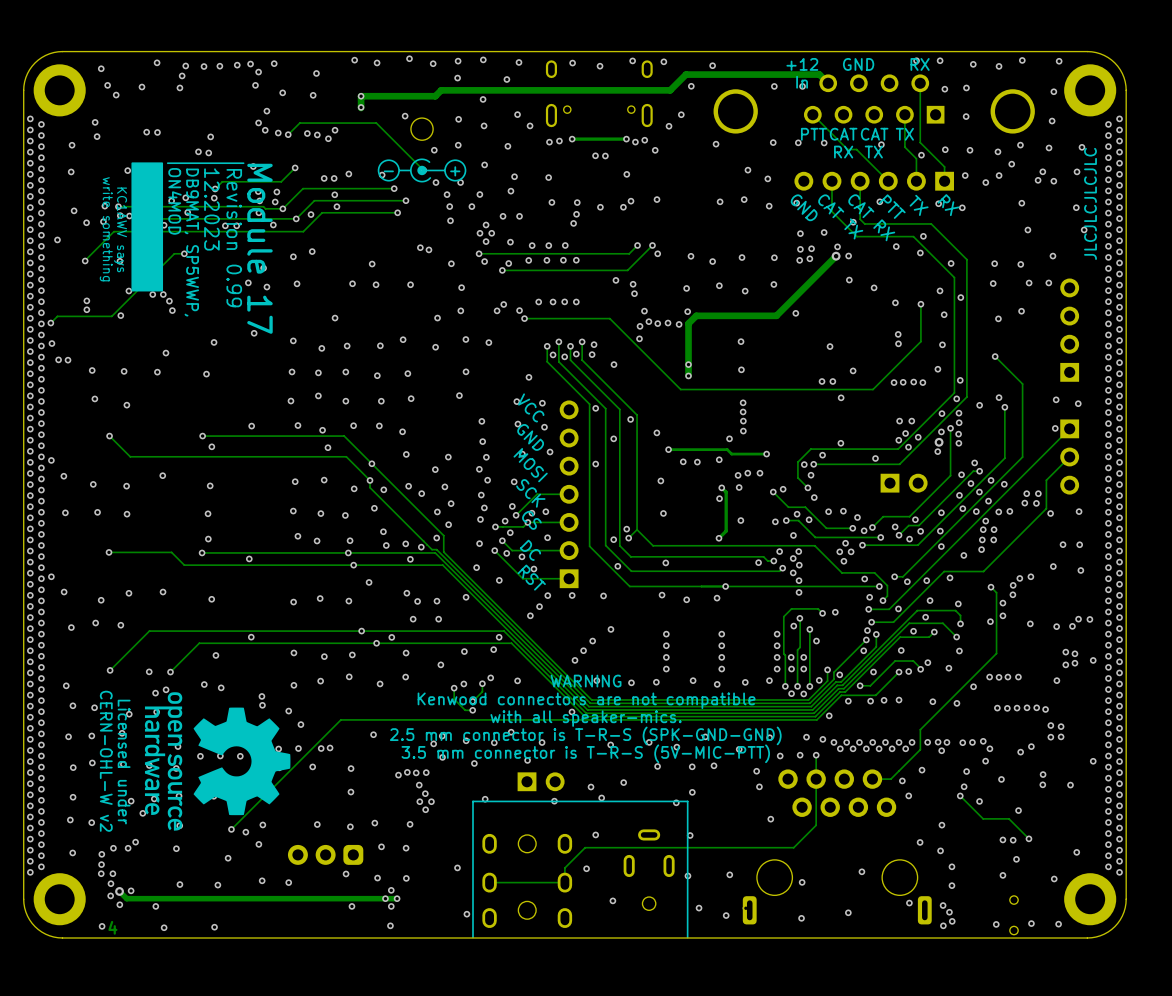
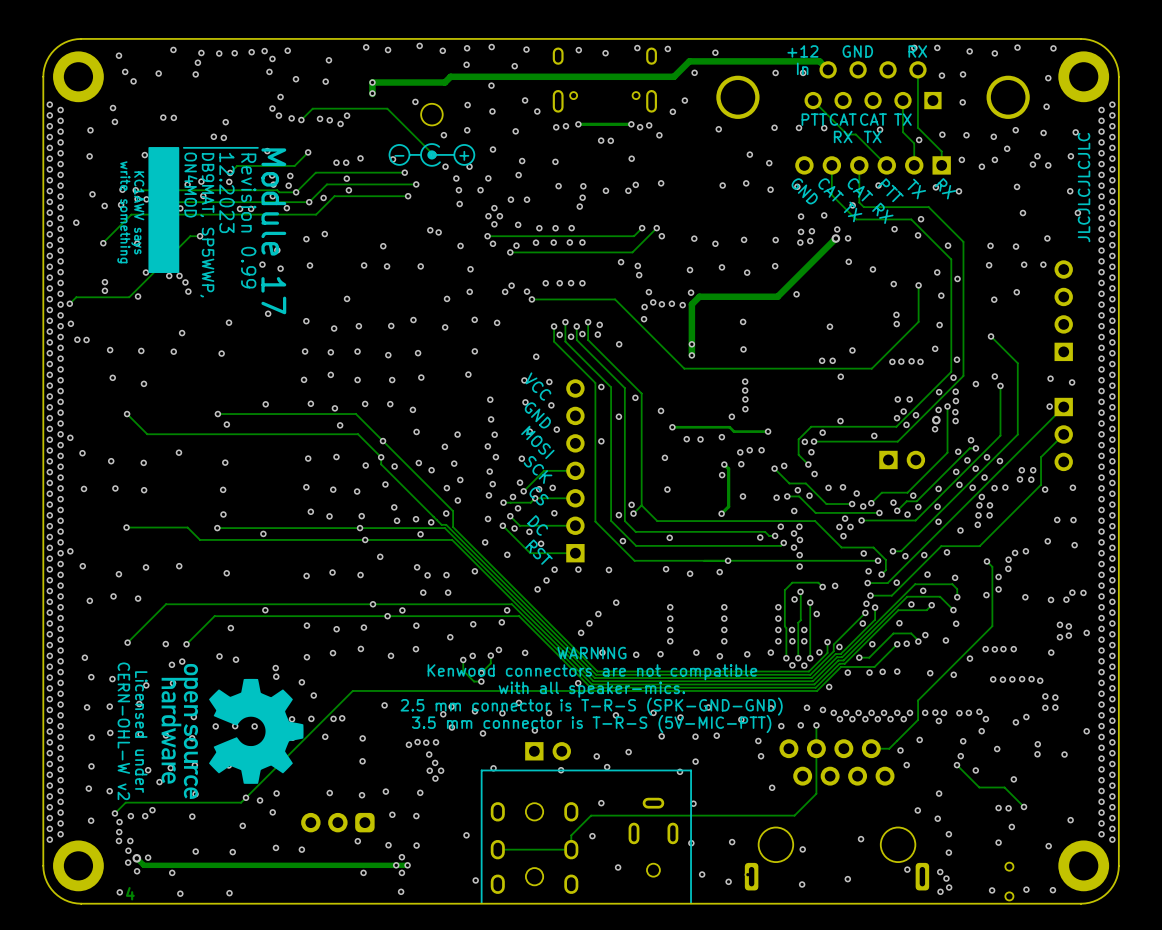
track: none -> (245, 797) (241, 802) (125, 802) (114, 813)
via: none -> (114, 813)

